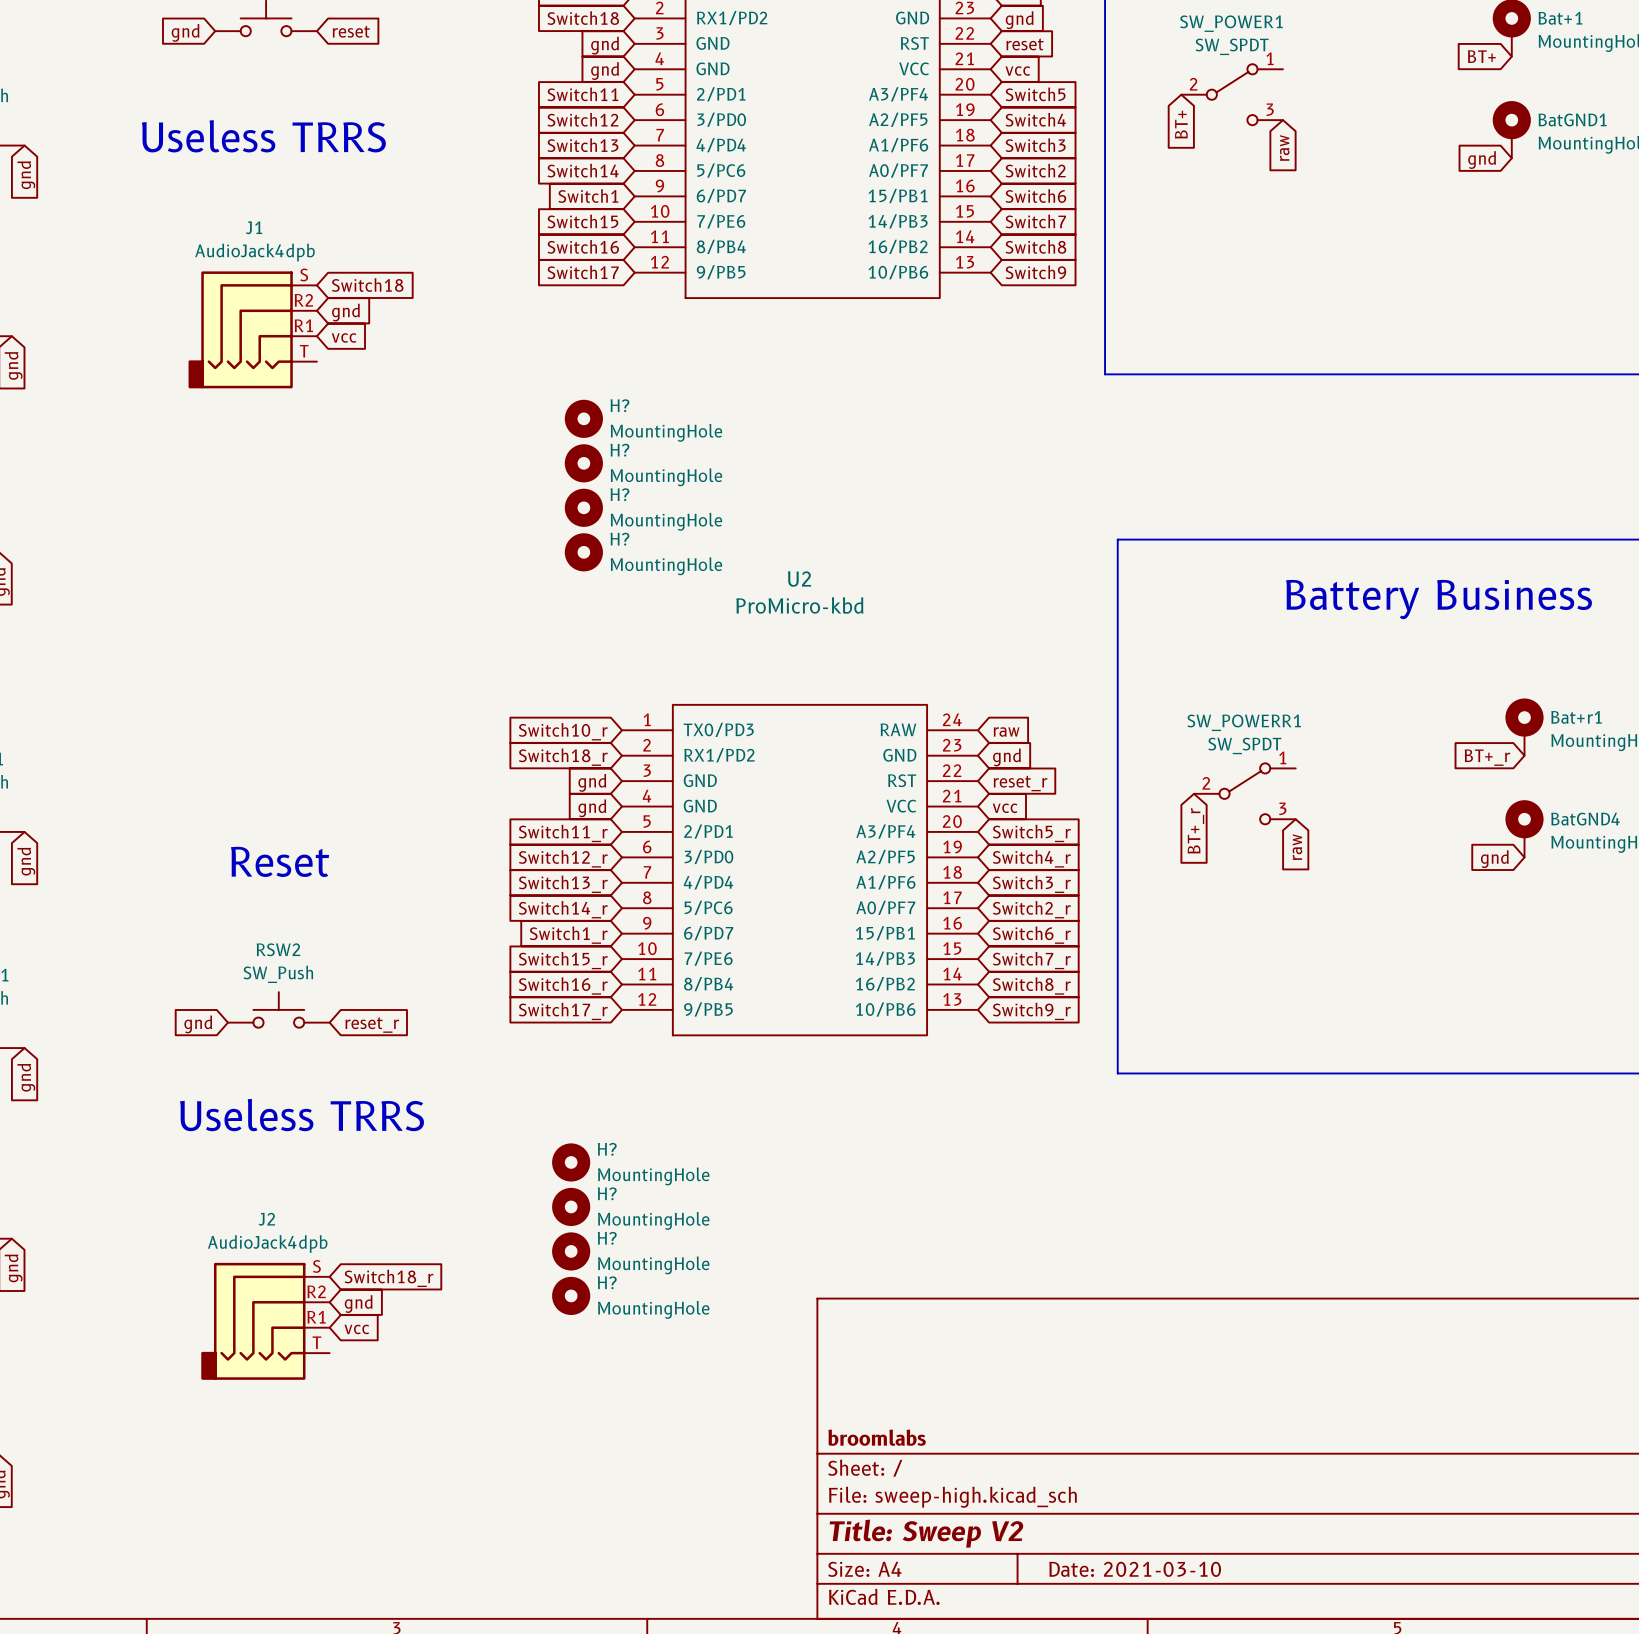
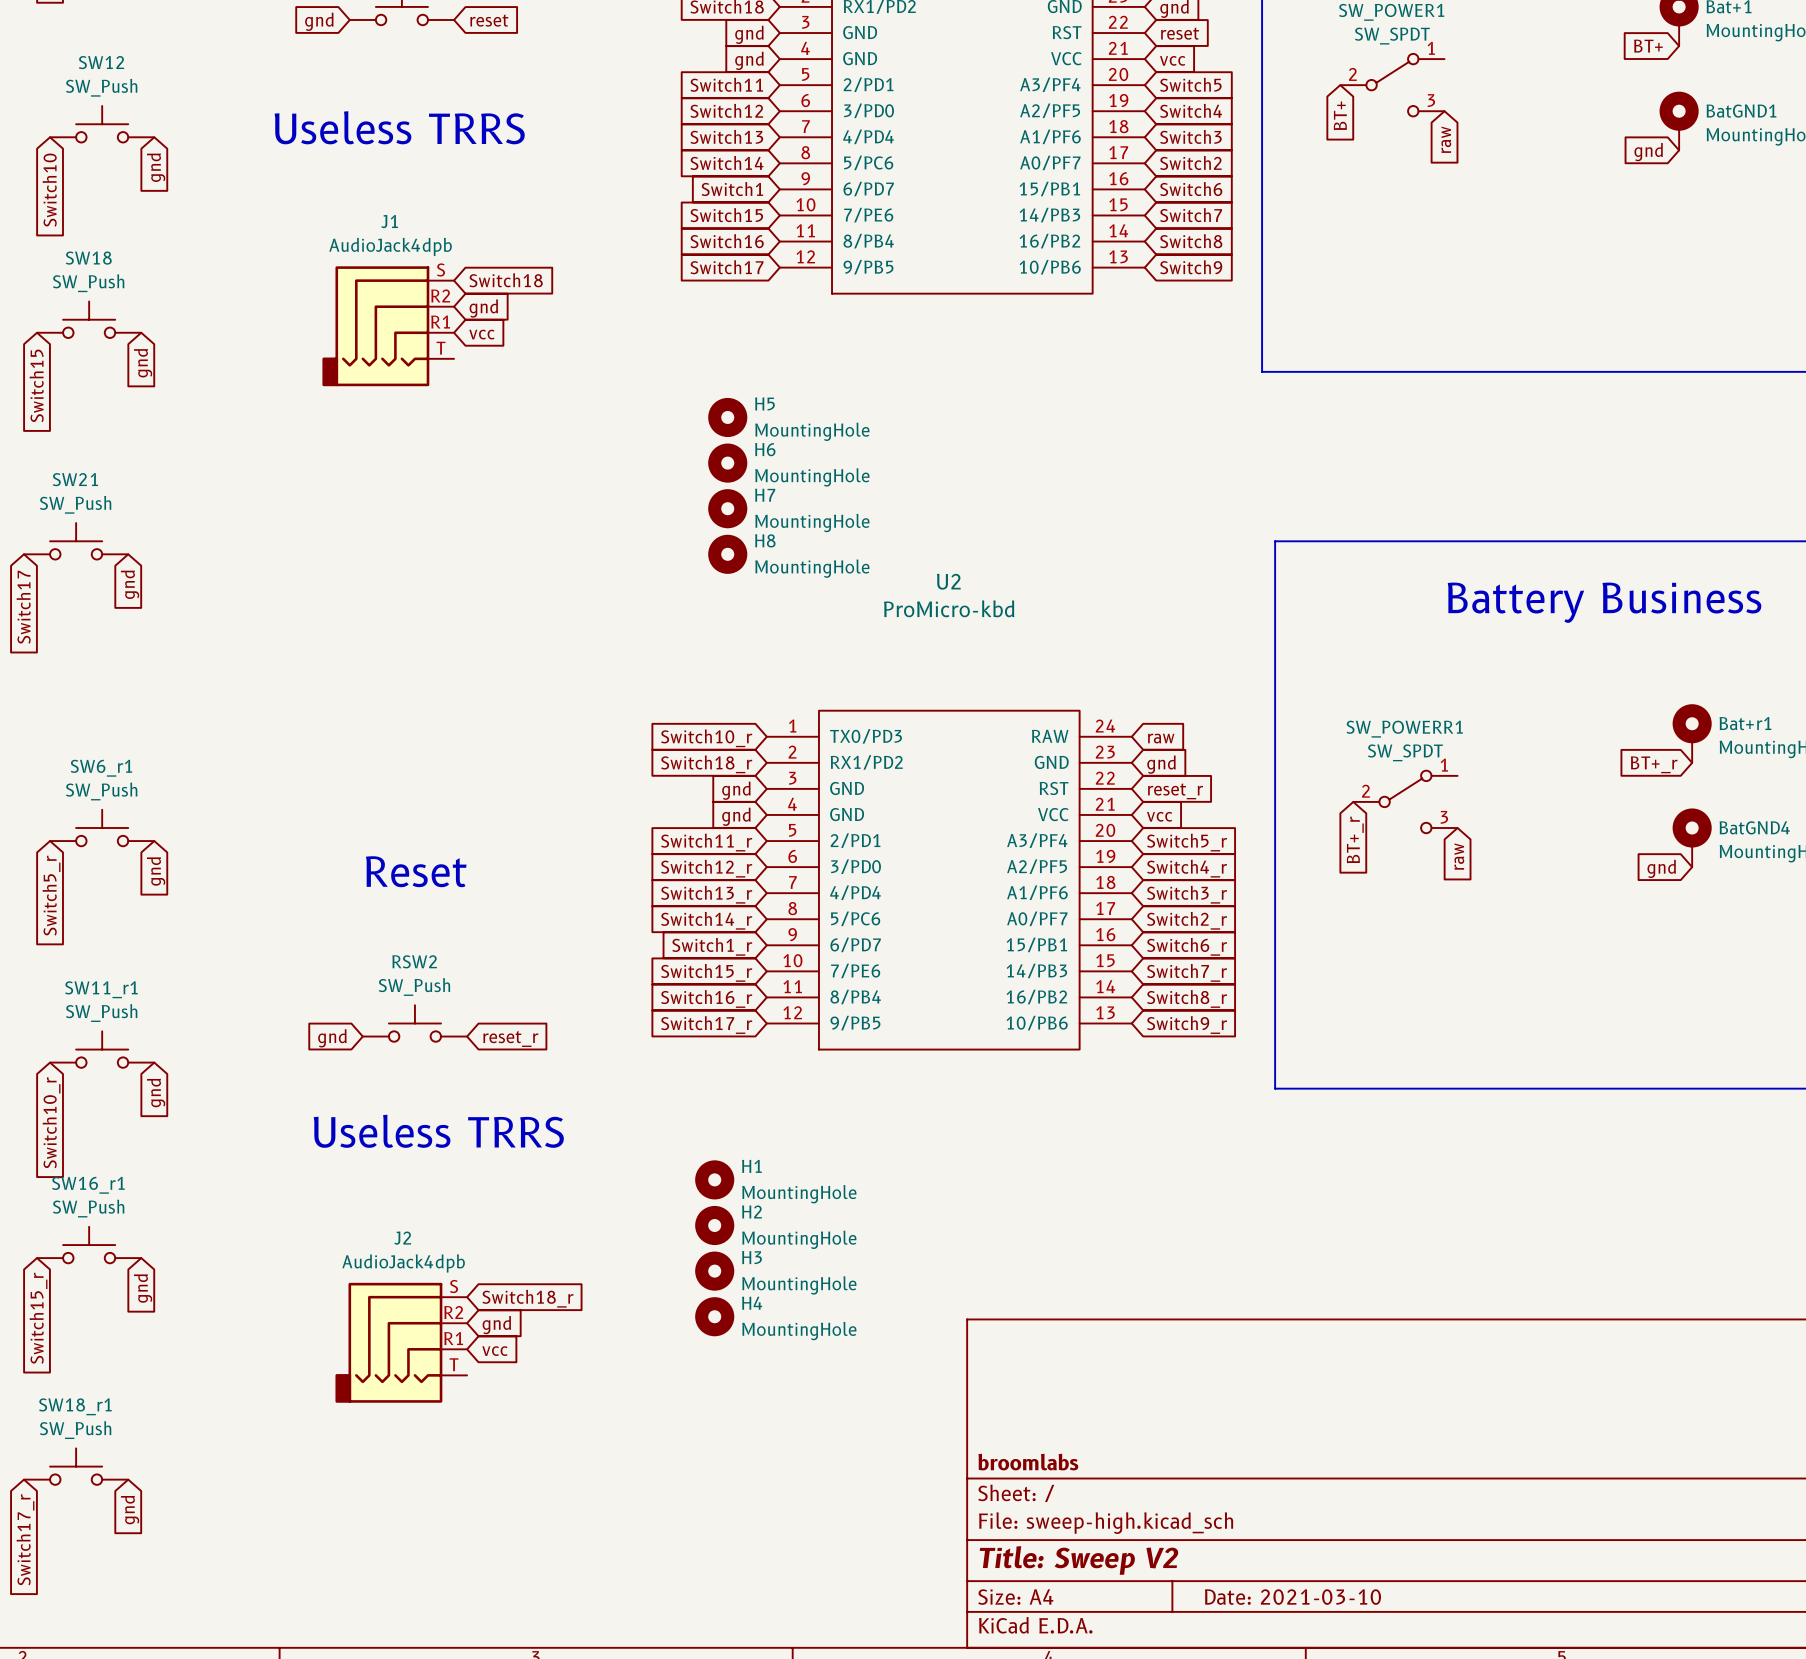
H? name: H? (619, 405) -> H5 (764, 403)
H? name: H? (619, 450) -> H6 (765, 449)
H? name: H? (619, 494) -> H7 (765, 495)
H? name: H? (619, 539) -> H8 (765, 540)
H? name: H? (607, 1149) -> H1 (751, 1166)
H? name: H? (607, 1193) -> H2 (751, 1211)
H? name: H? (607, 1238) -> H3 (751, 1257)
H? name: H? (607, 1282) -> H4 (752, 1303)

